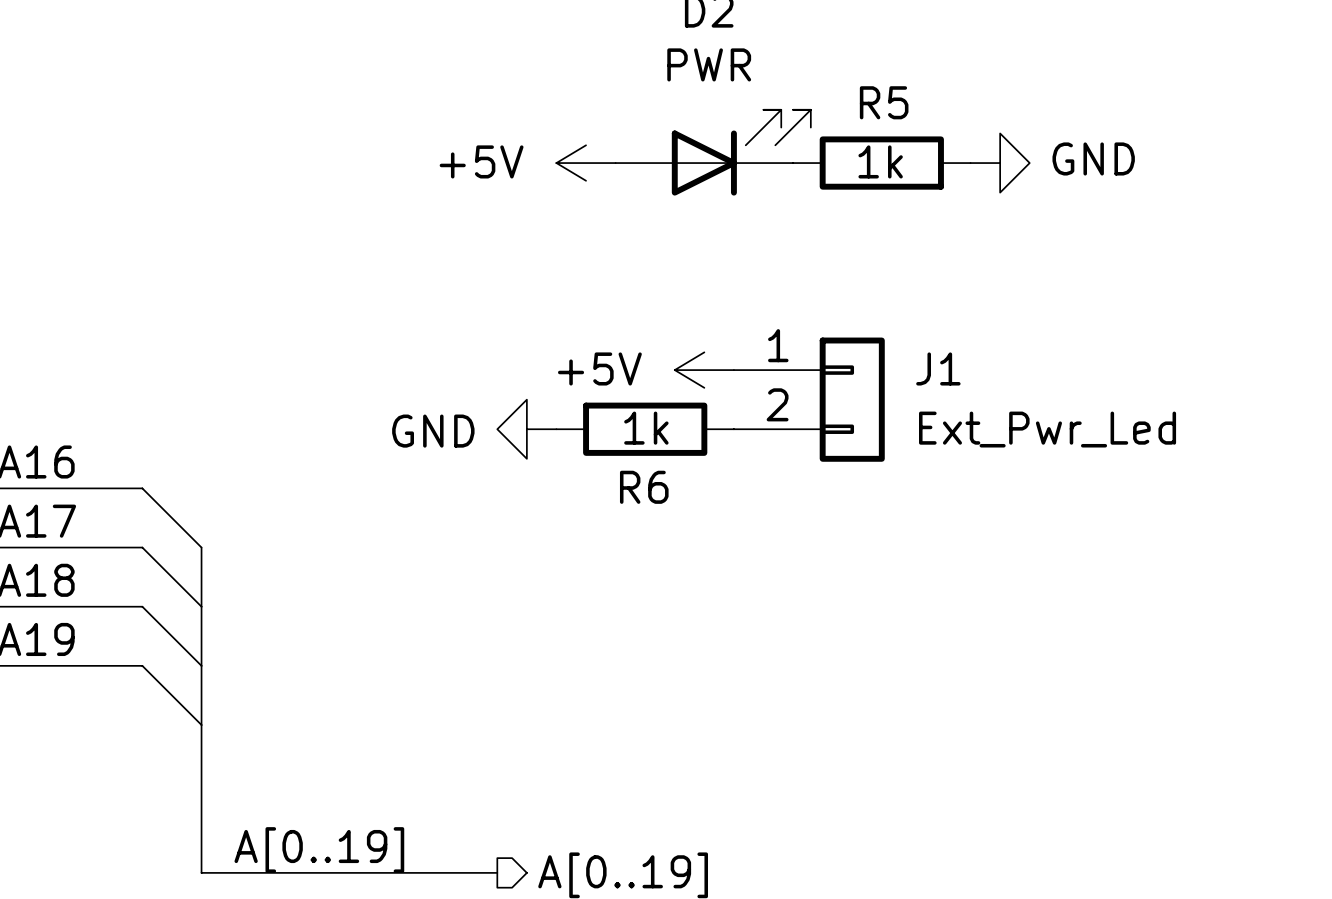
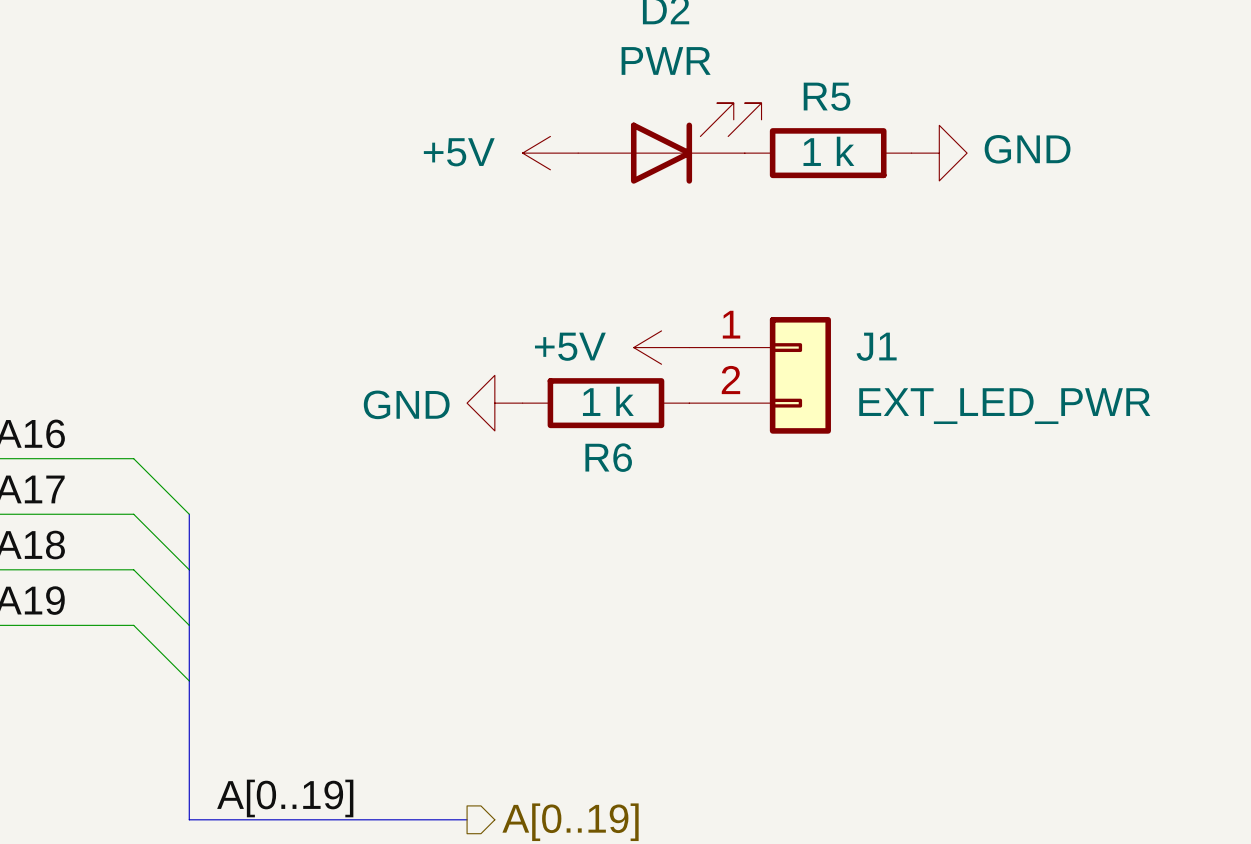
R5 value: 1k (880, 161) -> 1 k (828, 151)
R6 value: 1k (646, 428) -> 1 k (608, 401)
J1 value: Ext_Pwr_Led (1047, 429) -> EXT_LED_PWR (1004, 406)

